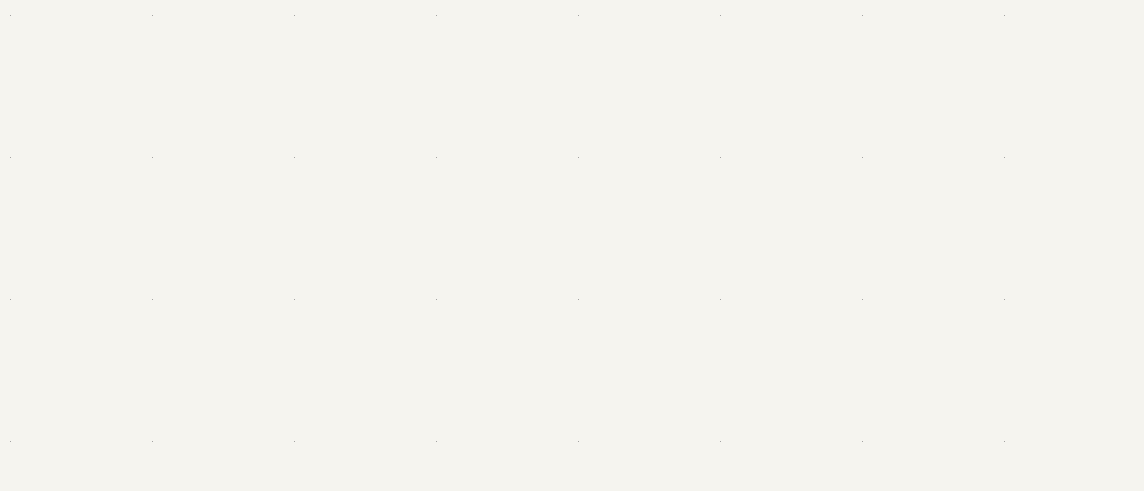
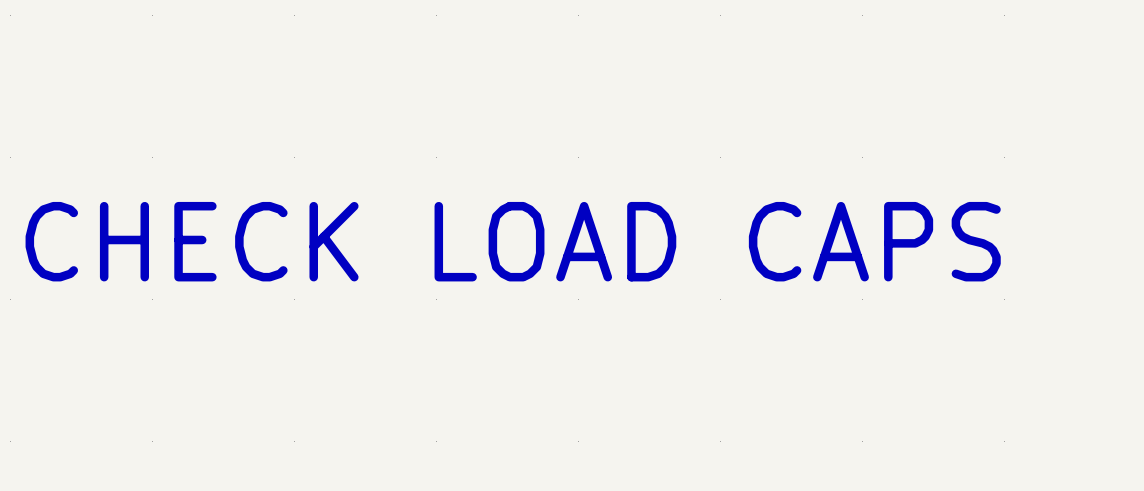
text: none -> CHECK LOAD CAPS (513, 241)

